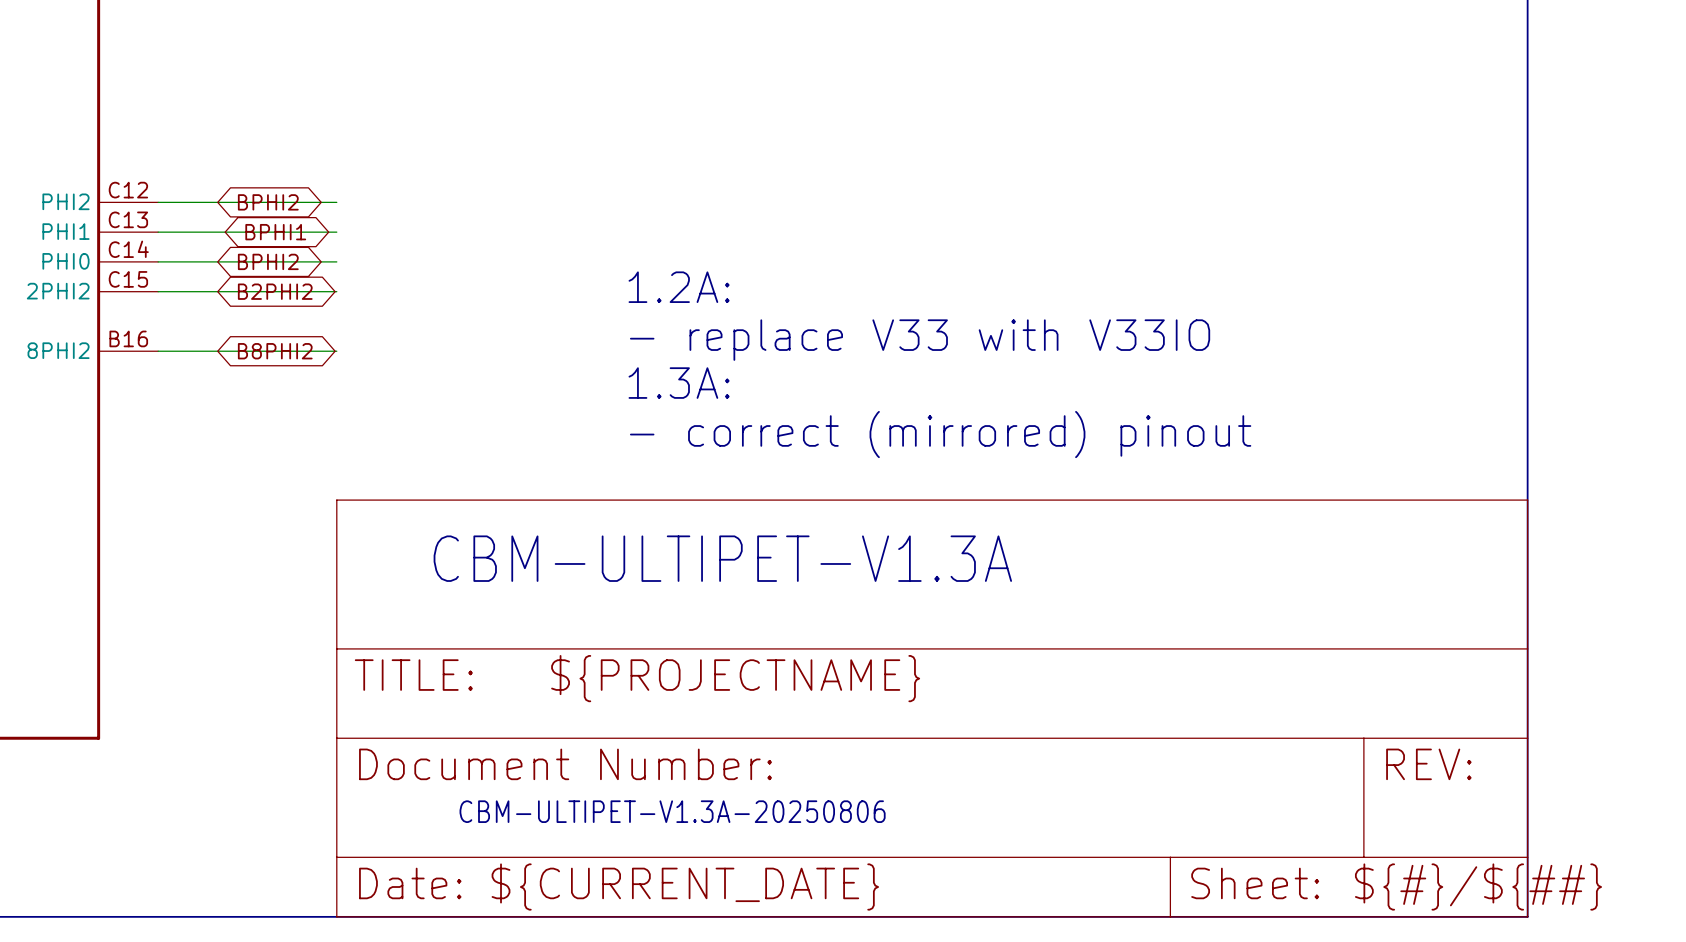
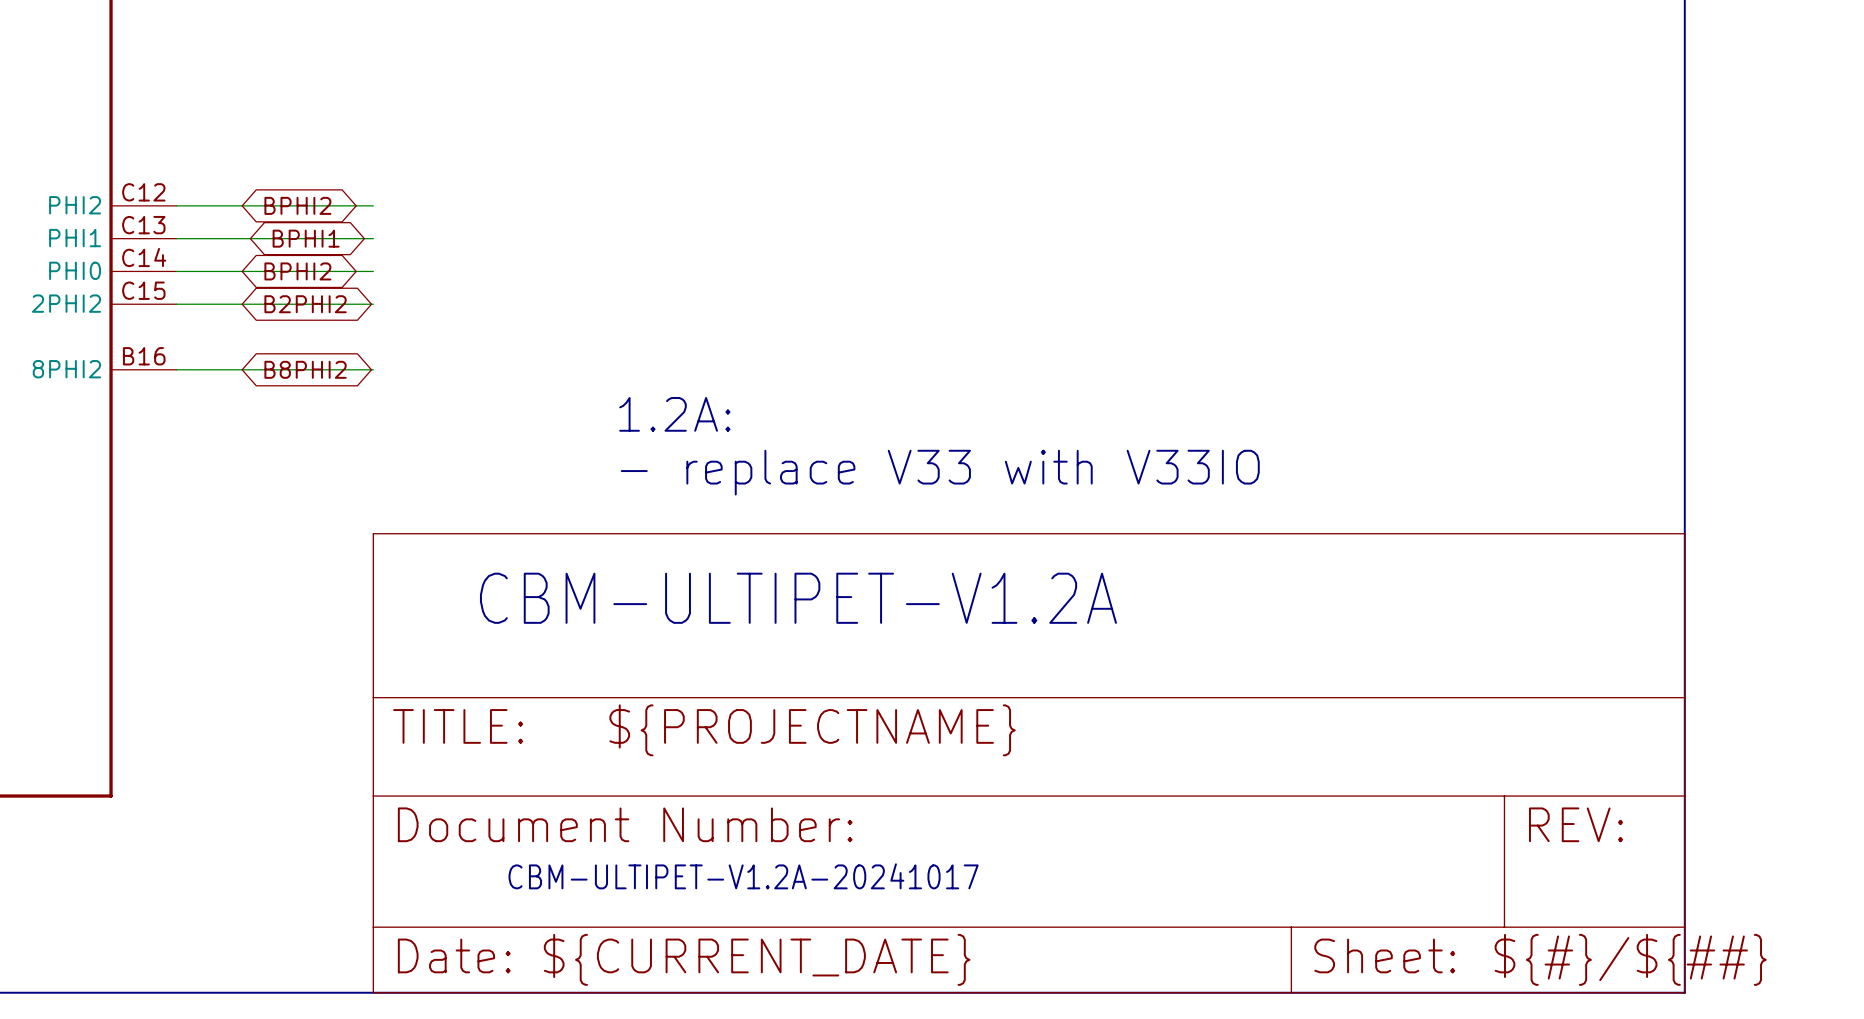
text position: 1.2A: (679, 287) -> 1.2A: (674, 414)
text position: - replace V33 with V33IO (920, 340) -> - replace V33 with V33IO (940, 472)
text: 1.3A: (679, 383) -> none
text: - correct (mirrored) pinout (940, 434) -> none
text: CBM-ULTIPET-V1.3A (722, 558) -> CBM-ULTIPET-V1.2A (798, 598)
text: CBM-ULTIPET-V1.3A-20250806 (672, 811) -> CBM-ULTIPET-V1.2A-20241017 (743, 876)

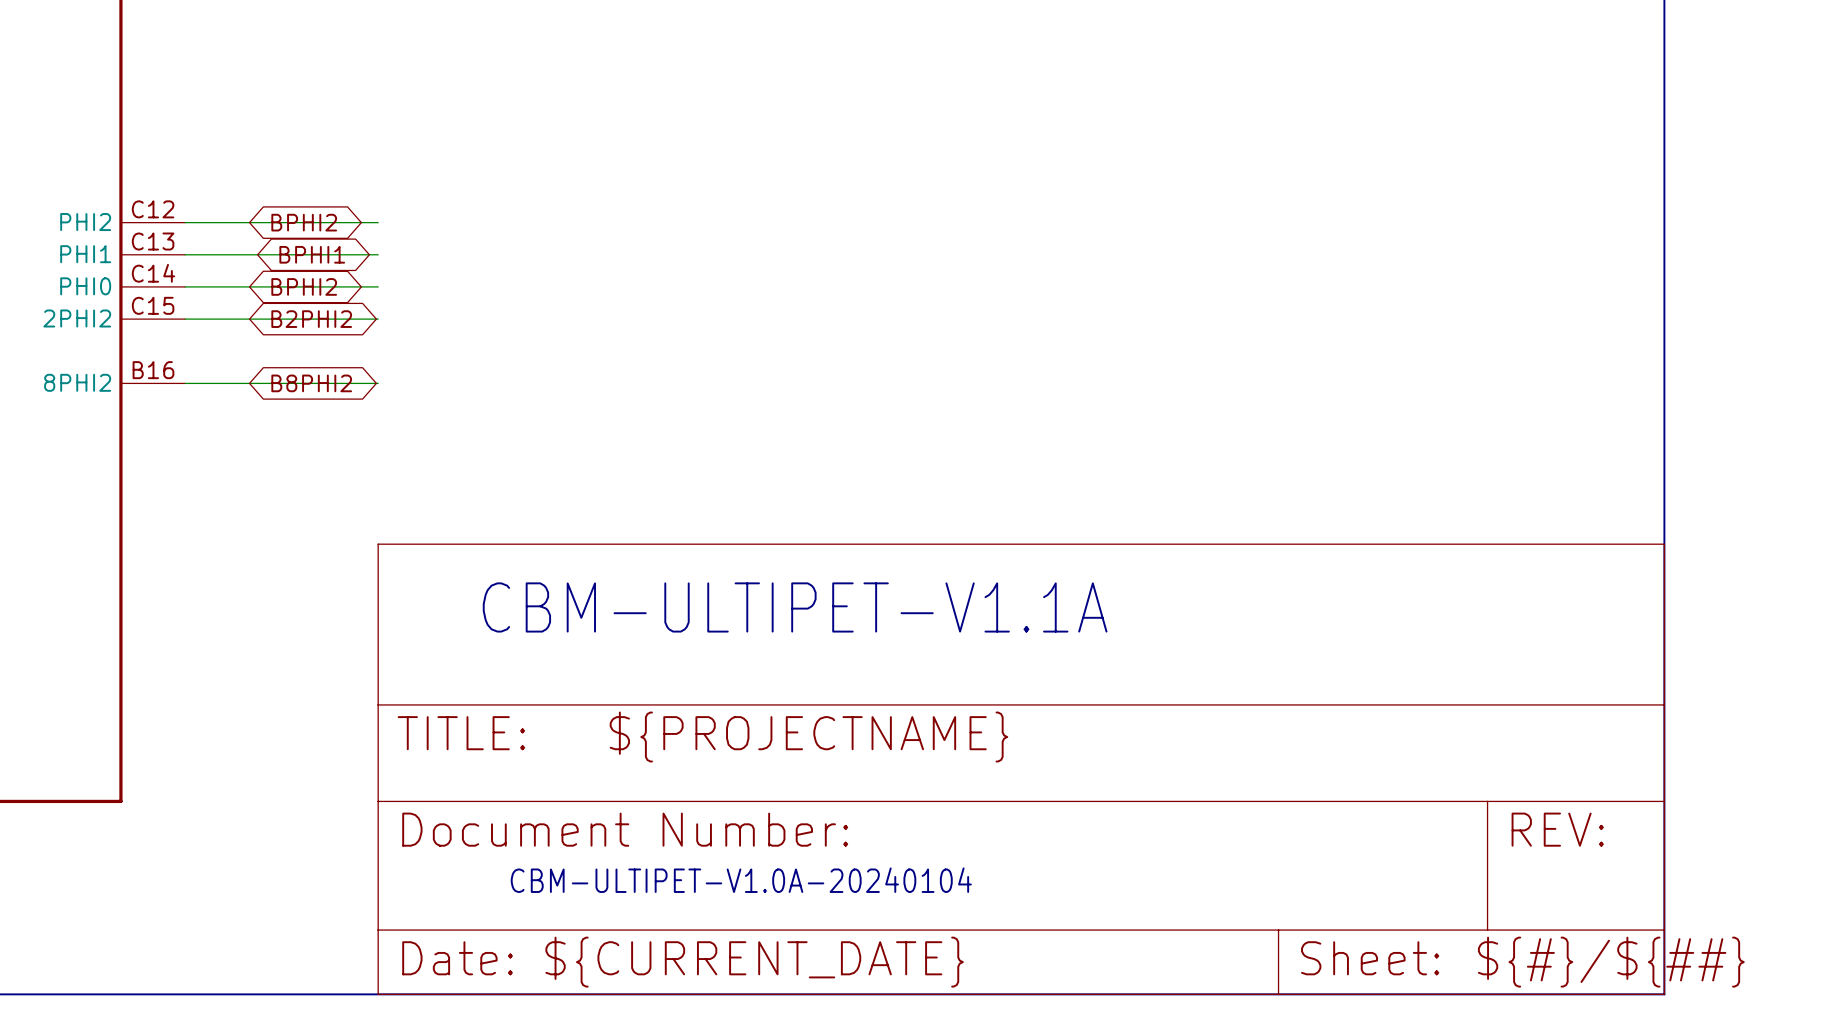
text: 1.2A: (674, 414) -> none
text: - replace V33 with V33IO (940, 472) -> none
text: CBM-ULTIPET-V1.2A (798, 598) -> CBM-ULTIPET-V1.1A (795, 607)
text: CBM-ULTIPET-V1.2A-20241017 (743, 876) -> CBM-ULTIPET-V1.0A-20240104 (741, 880)

